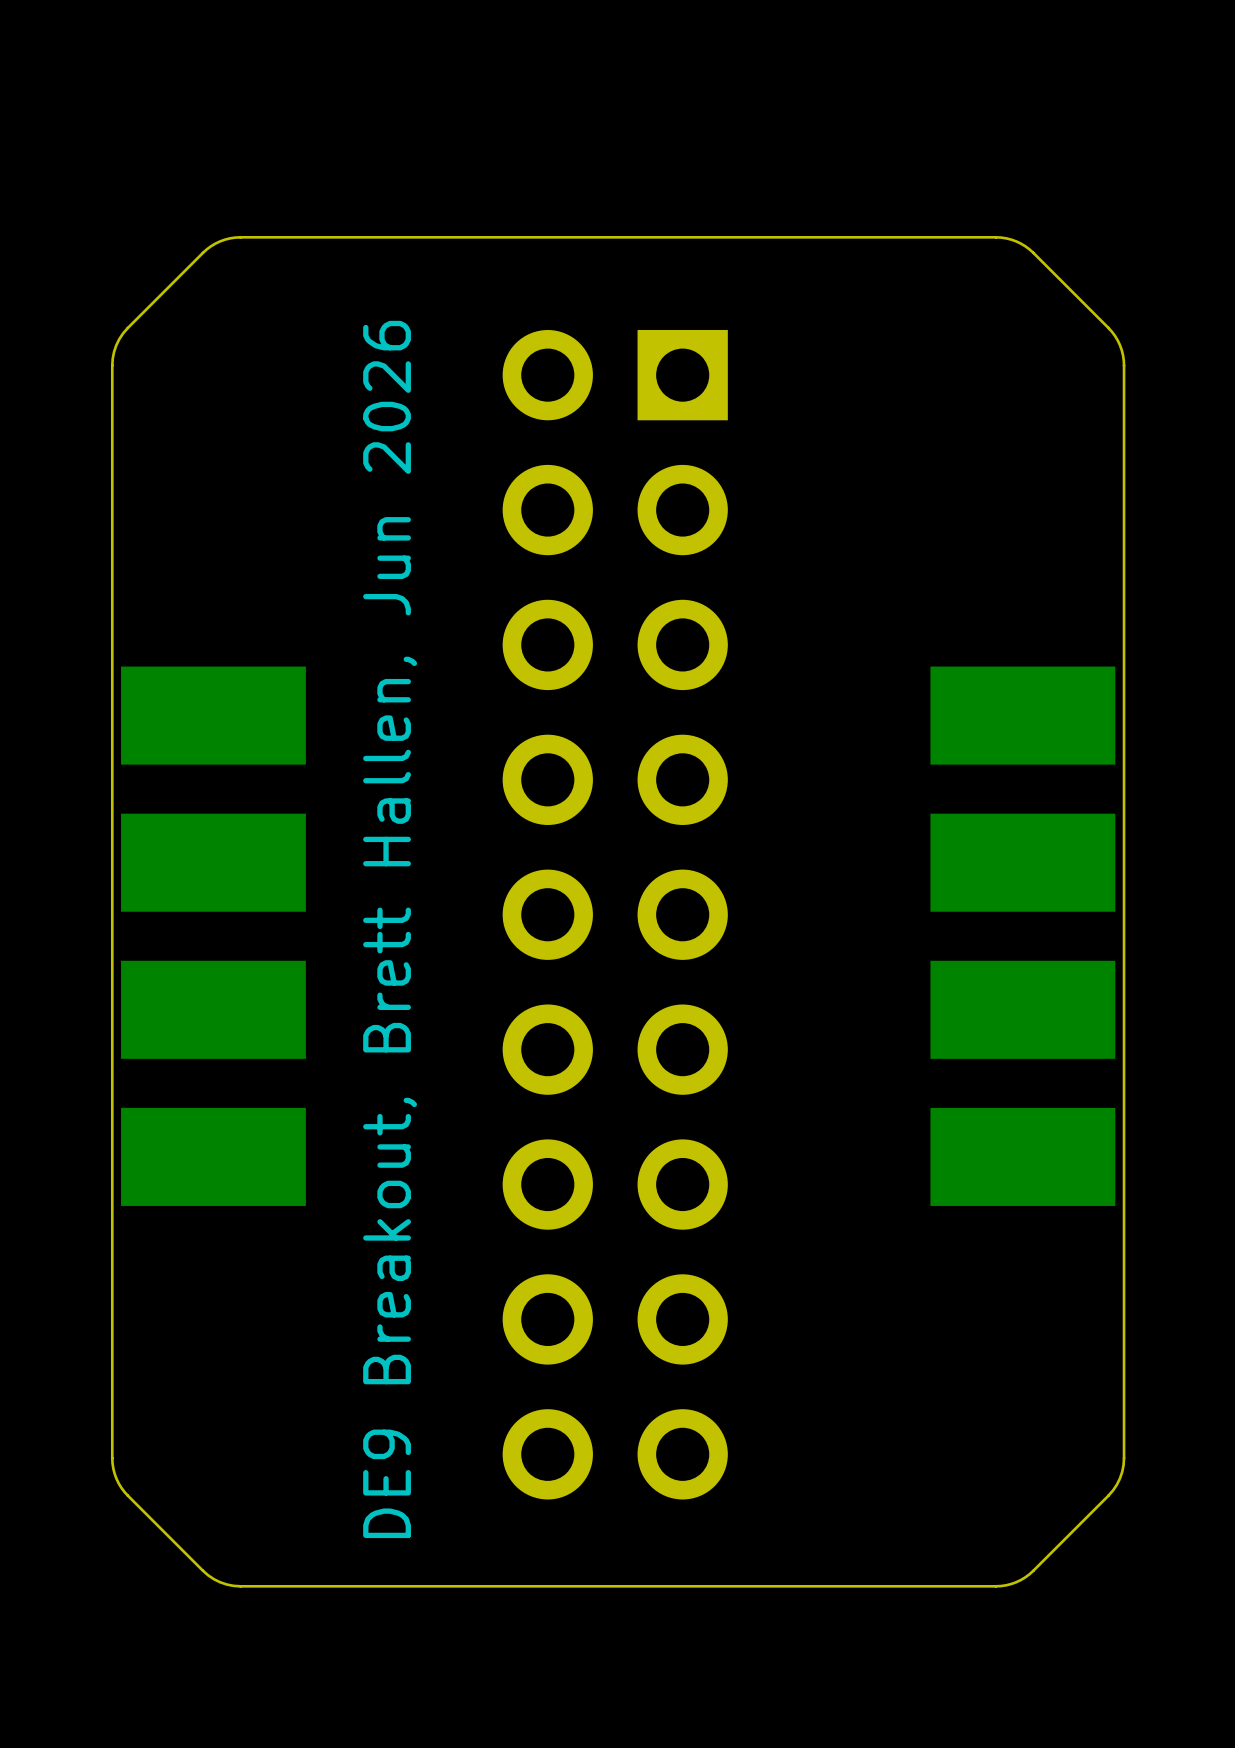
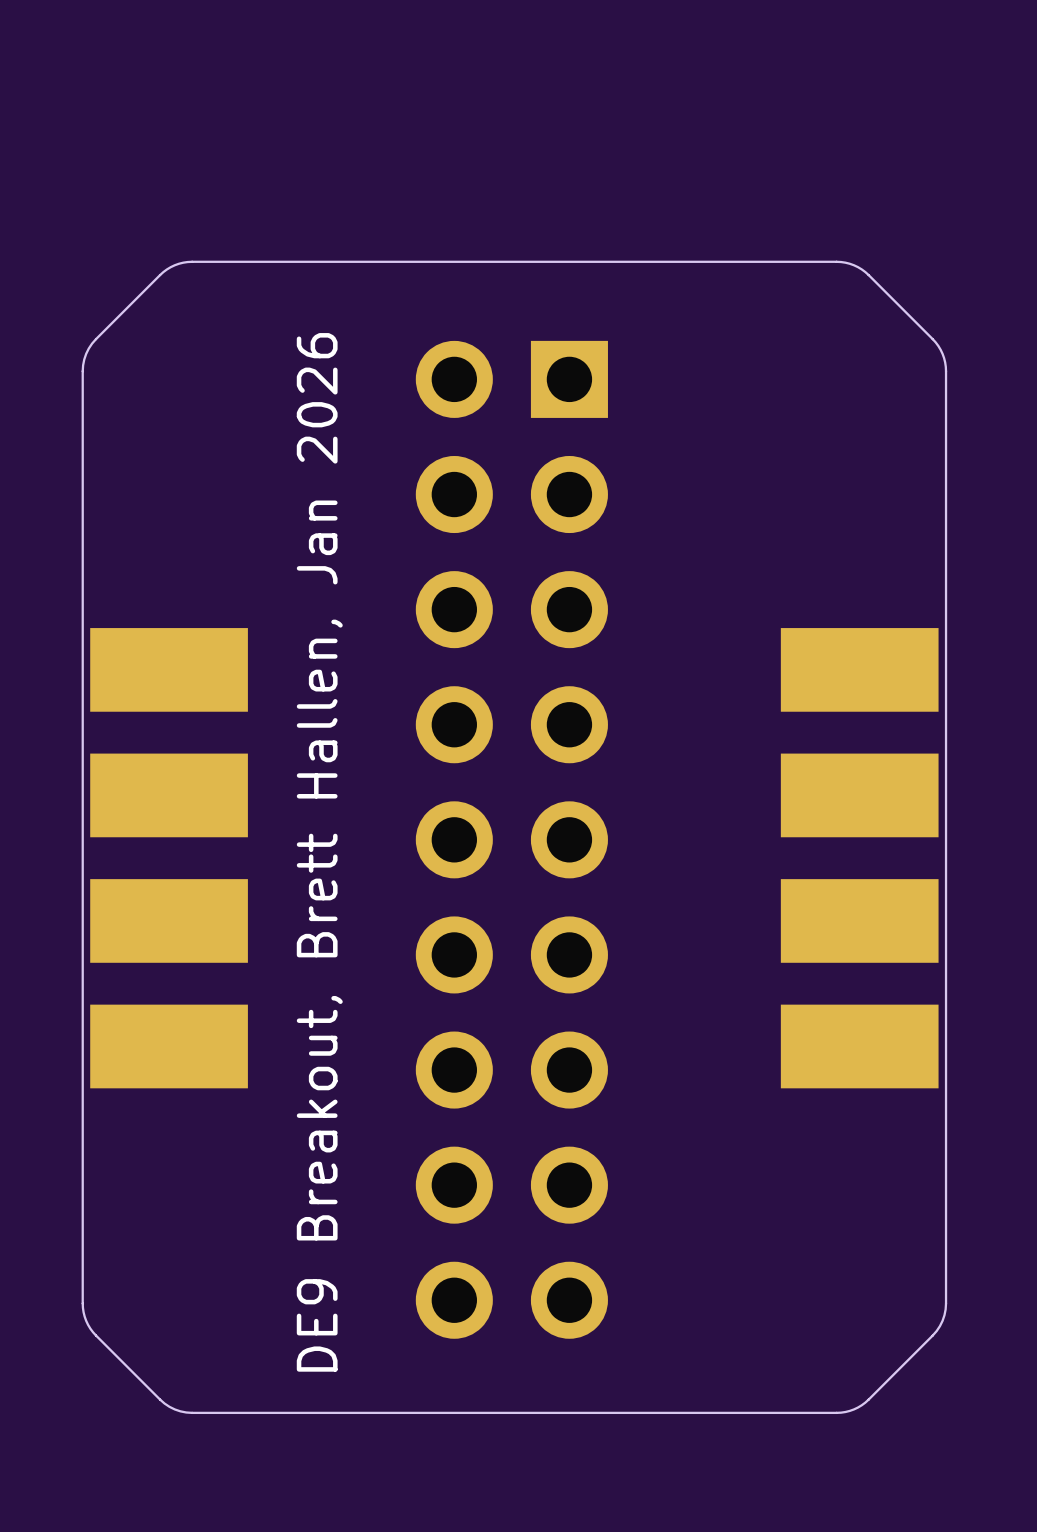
text: DE9 Breakout, Brett Hallen, Jun 2026 (390, 929) -> DE9 Breakout, Brett Hallen, Jan 2026 (319, 852)

